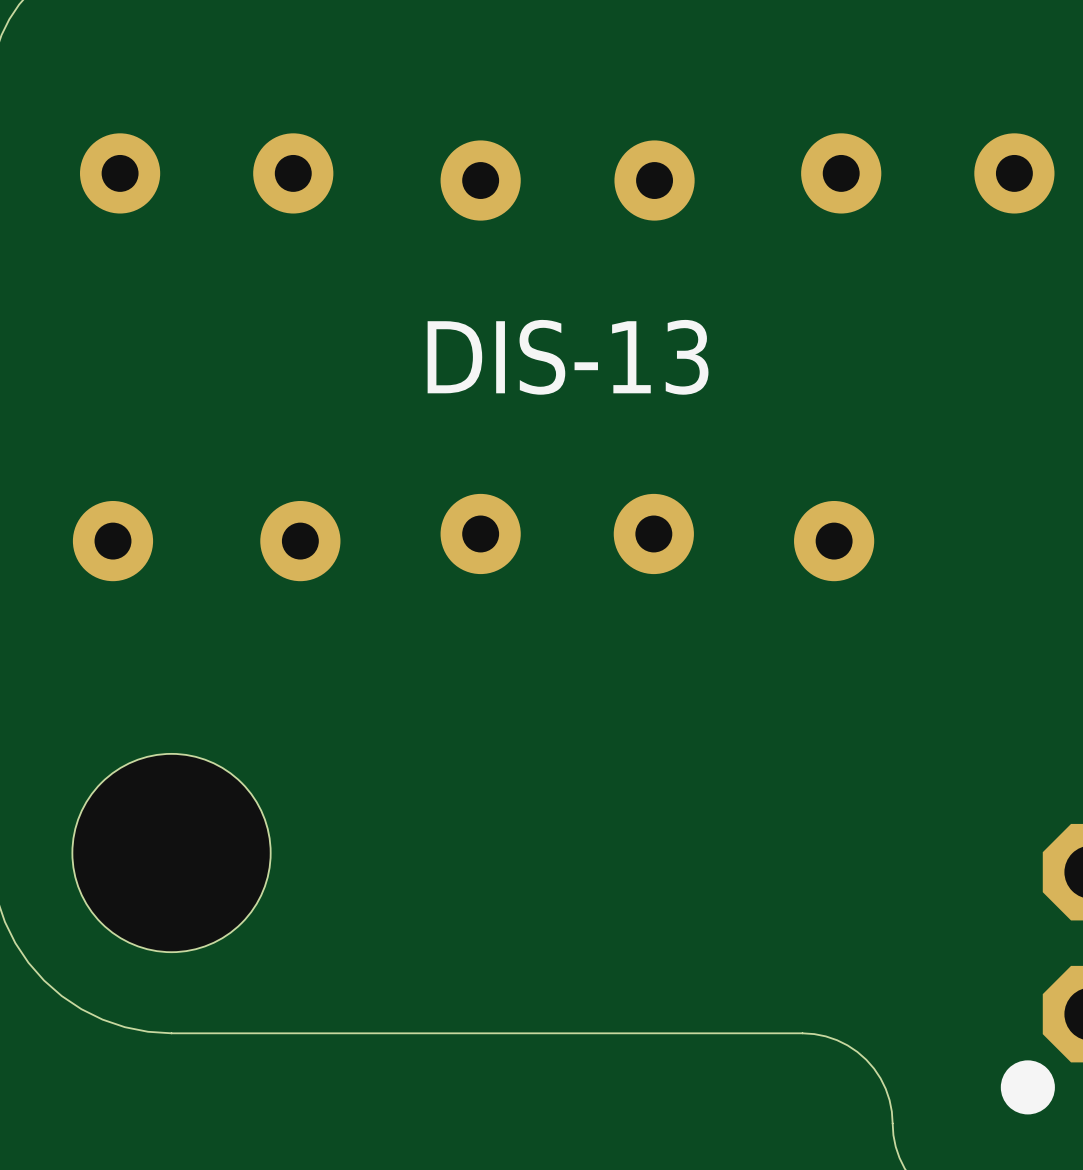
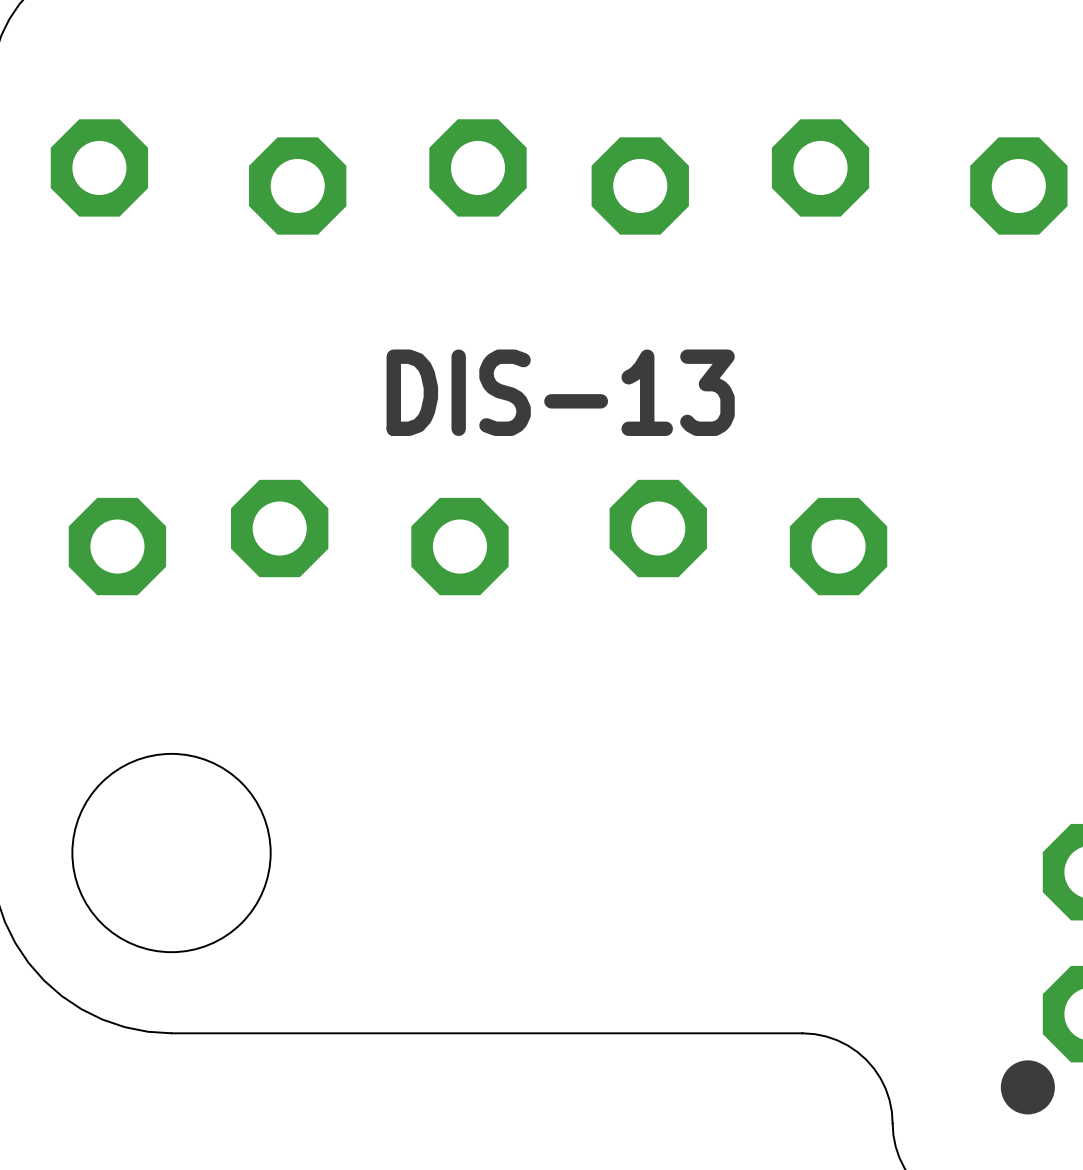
DIS-13 footprint: [72, 133, 1055, 582] -> [50, 119, 1068, 596]
DIS-13 name position: DIS-13 (568, 357) -> DIS-13 (560, 392)

